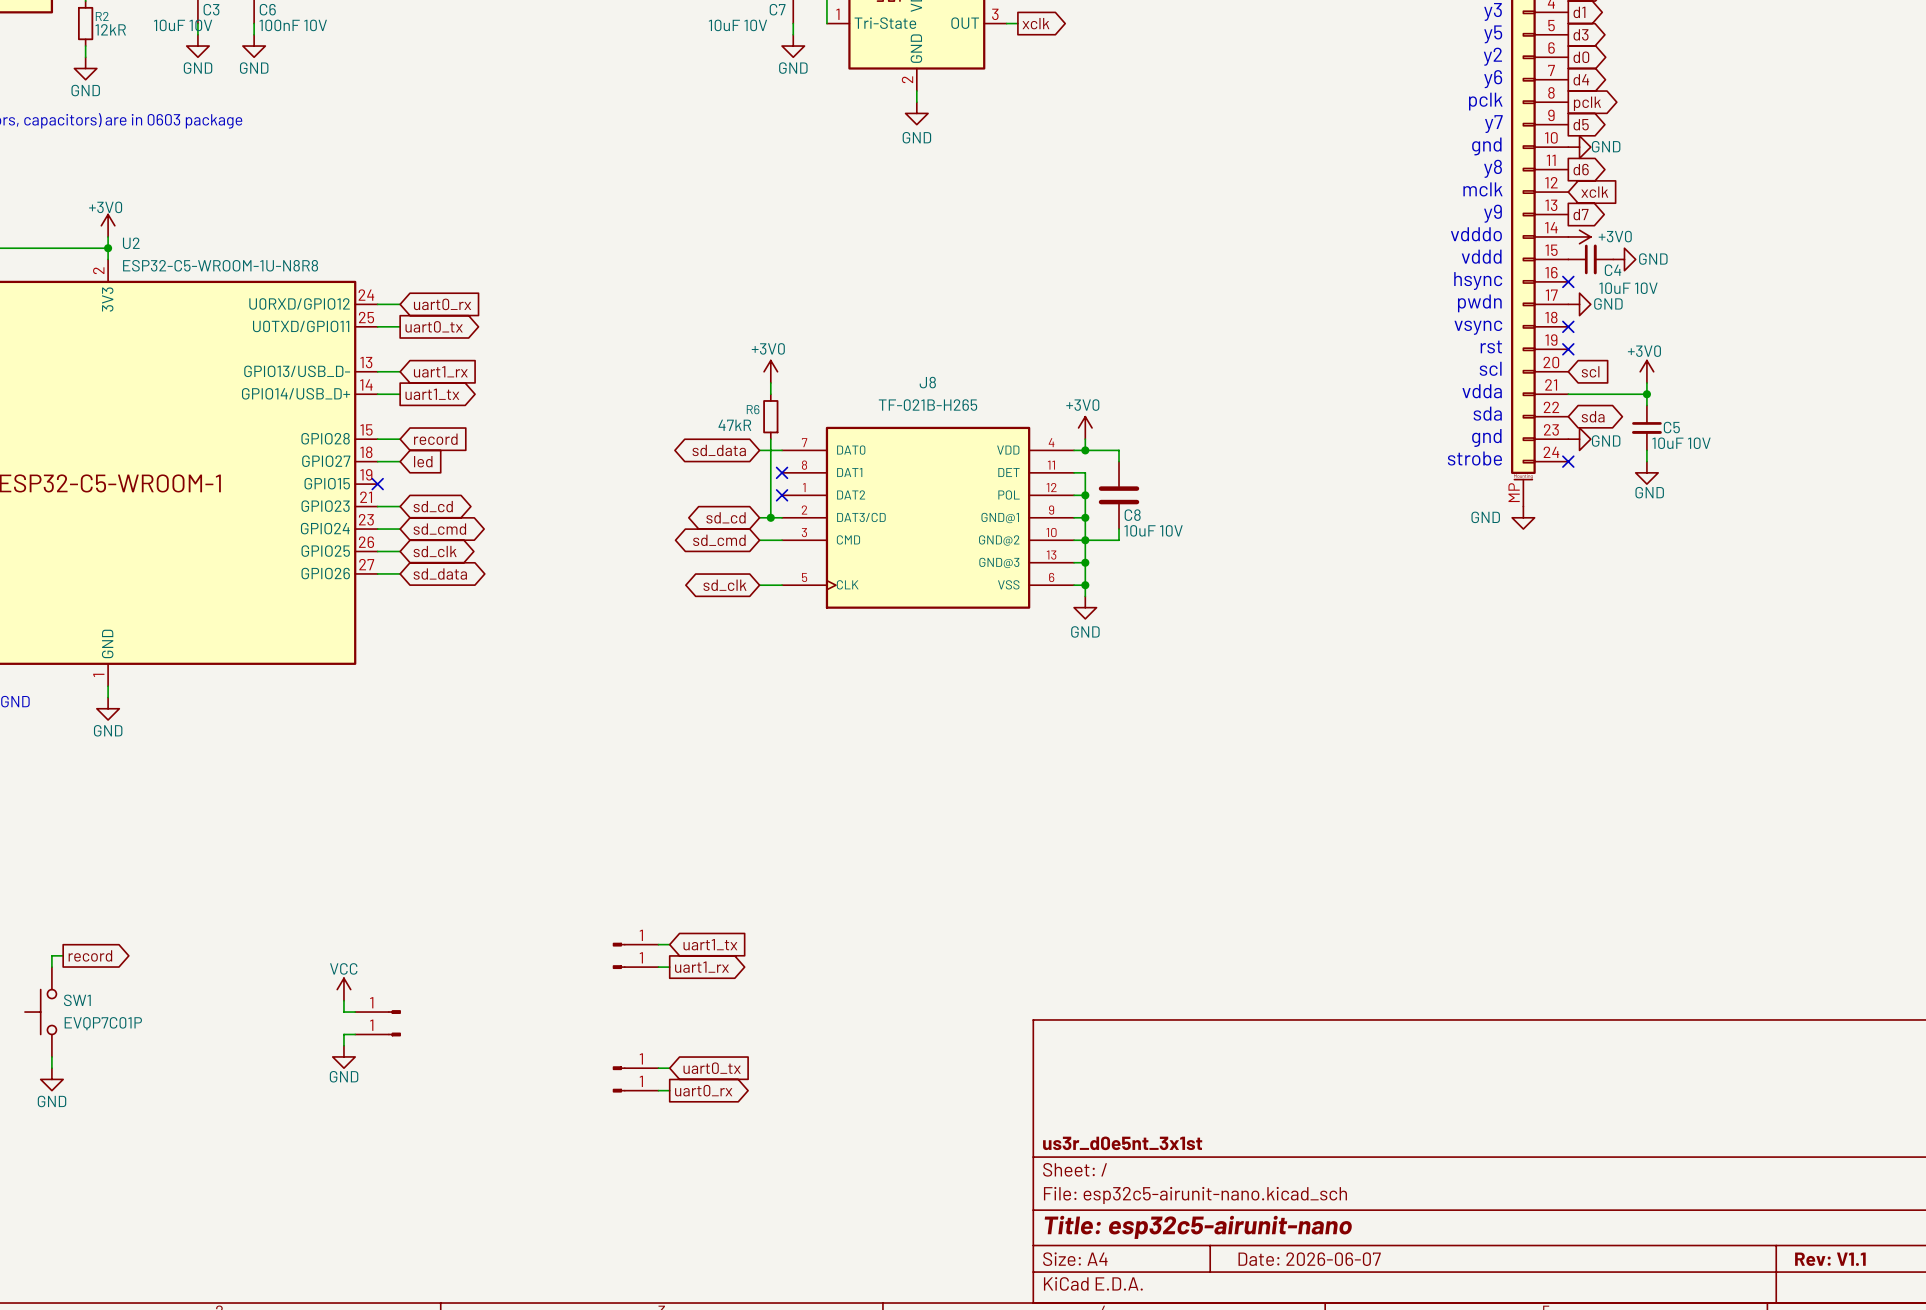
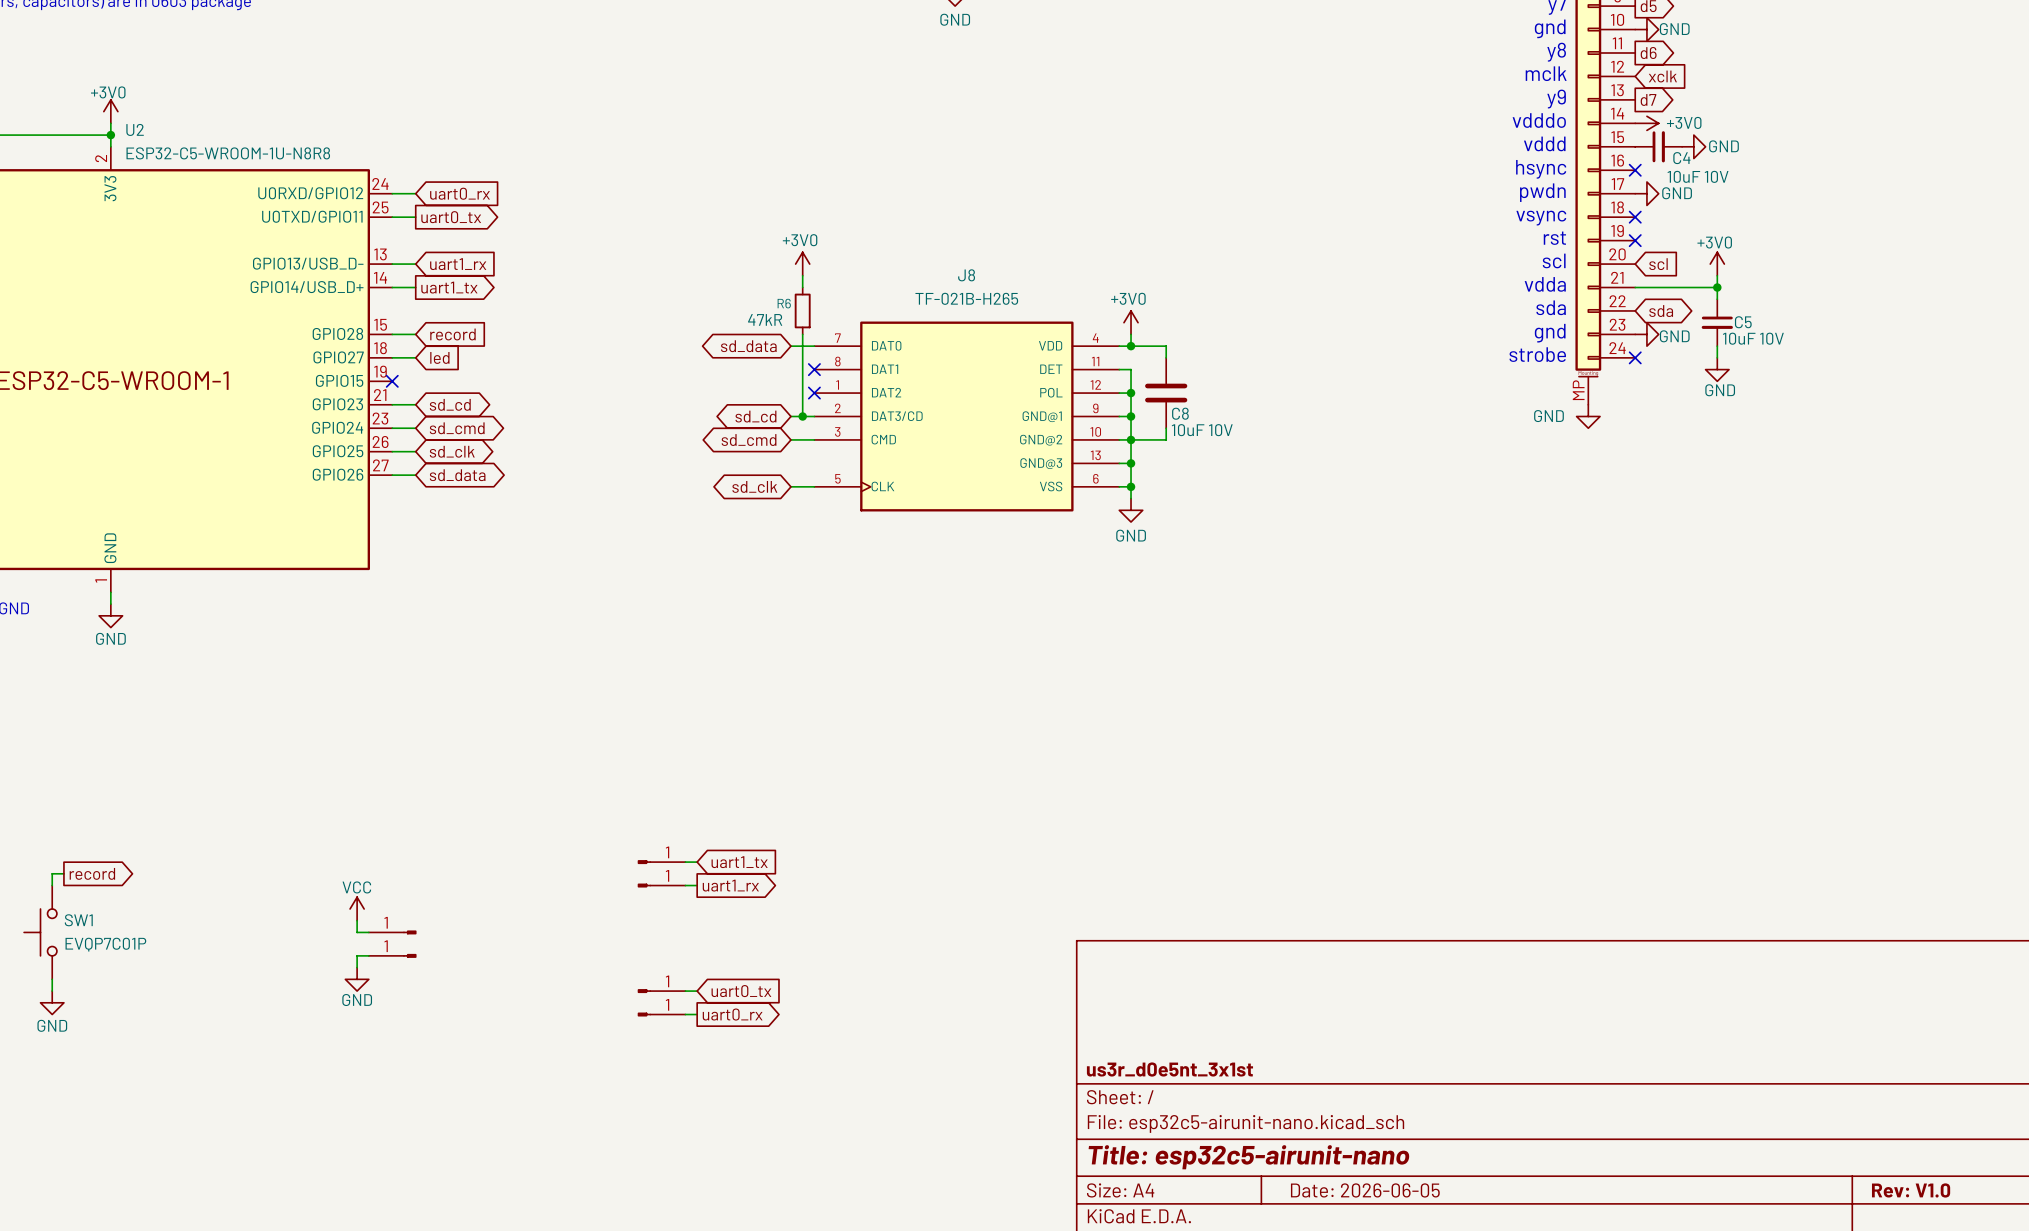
title block: Date: 2026-06-07 (1309, 1259) -> Date: 2026-06-05 (1365, 1190)
title block: Rev: V1.1 (1830, 1259) -> Rev: V1.0 (1911, 1190)

